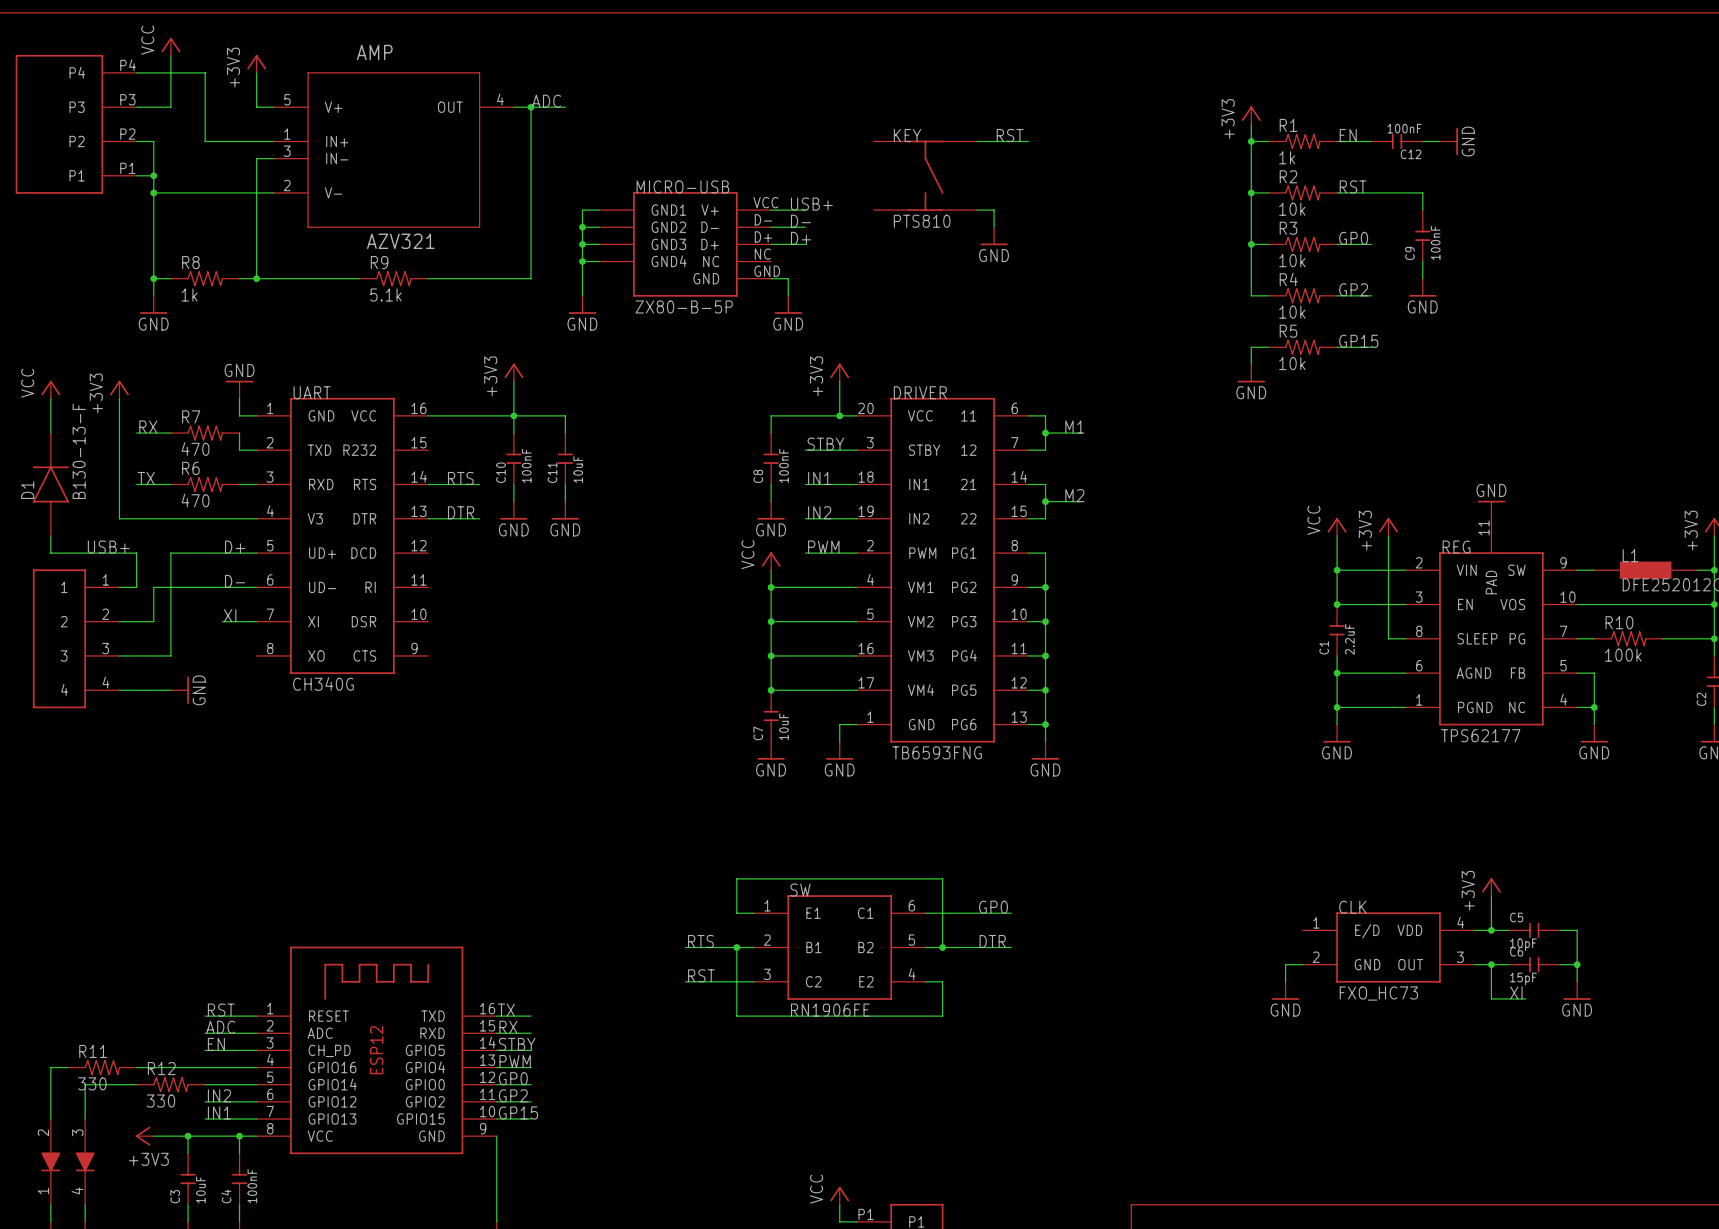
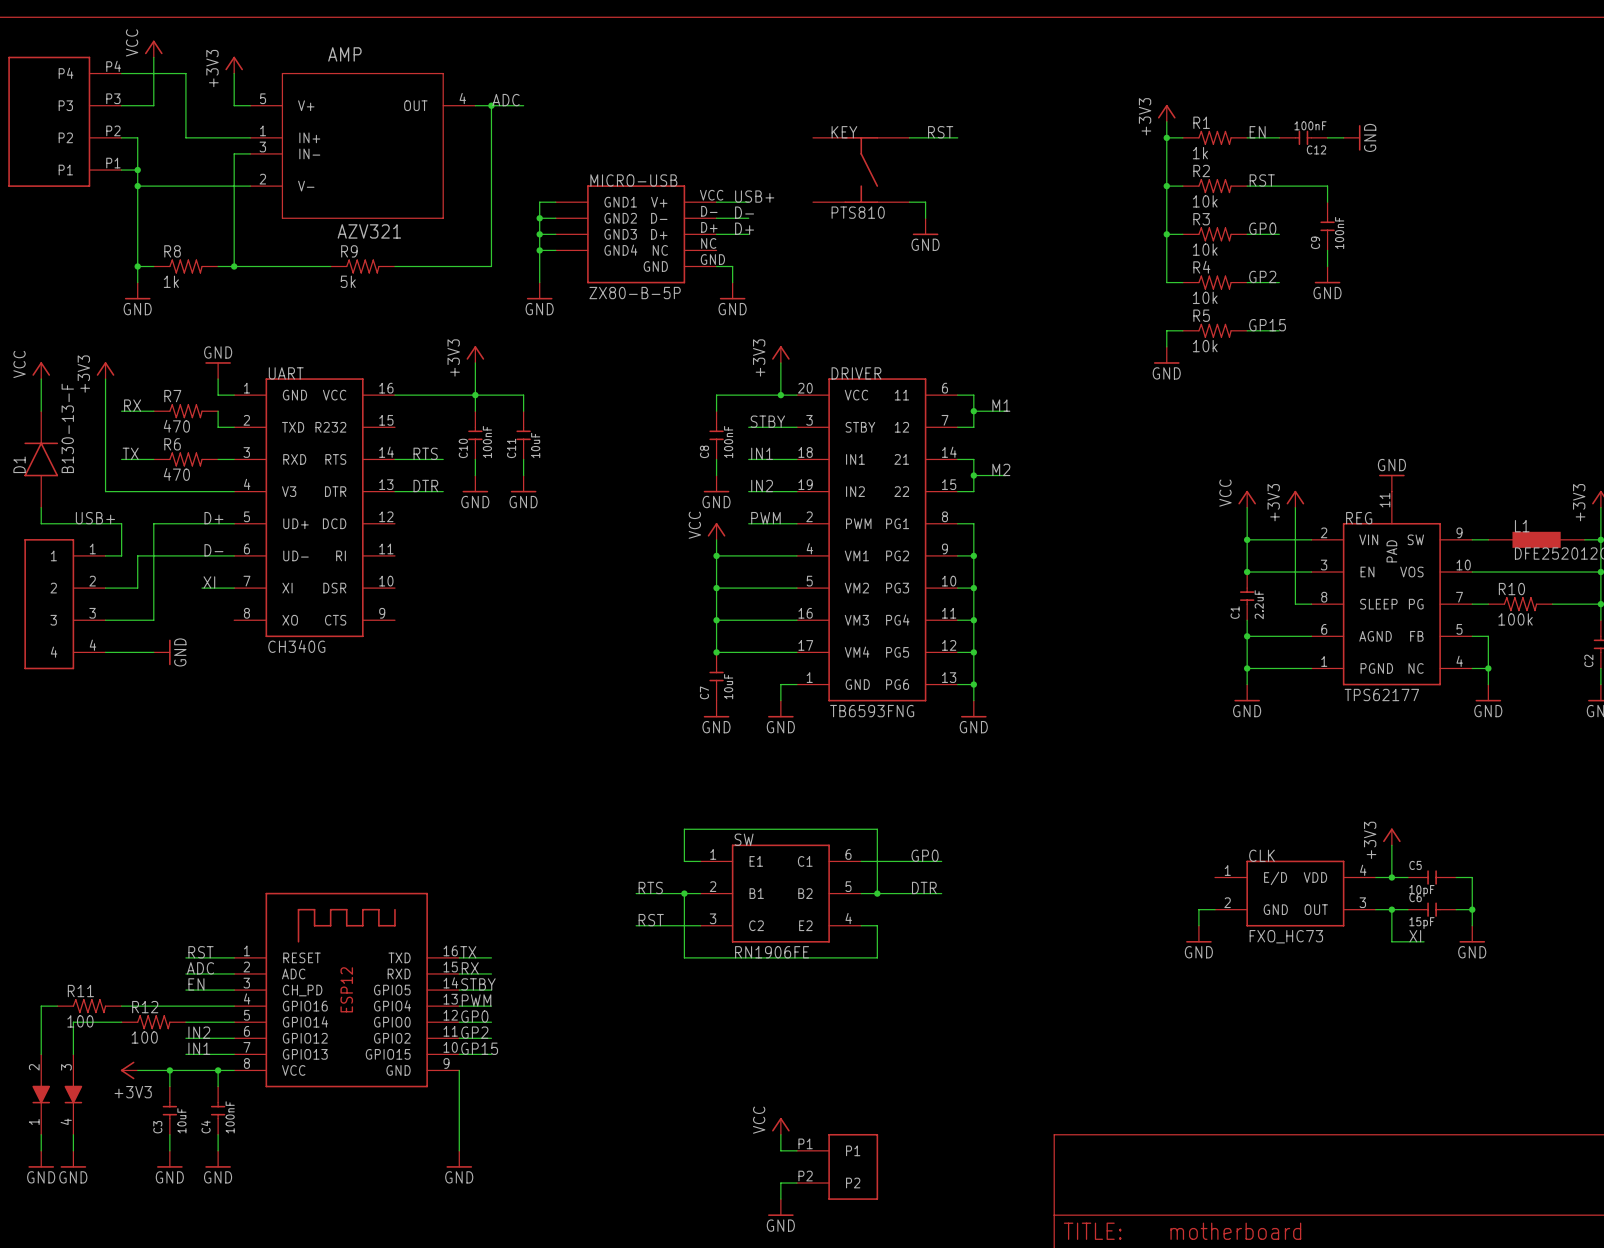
R9 value: 5.1k (385, 294) -> 5k (348, 281)
R11 value: 330 (92, 1083) -> 100 (80, 1021)
R12 value: 330 (160, 1101) -> 100 (144, 1037)

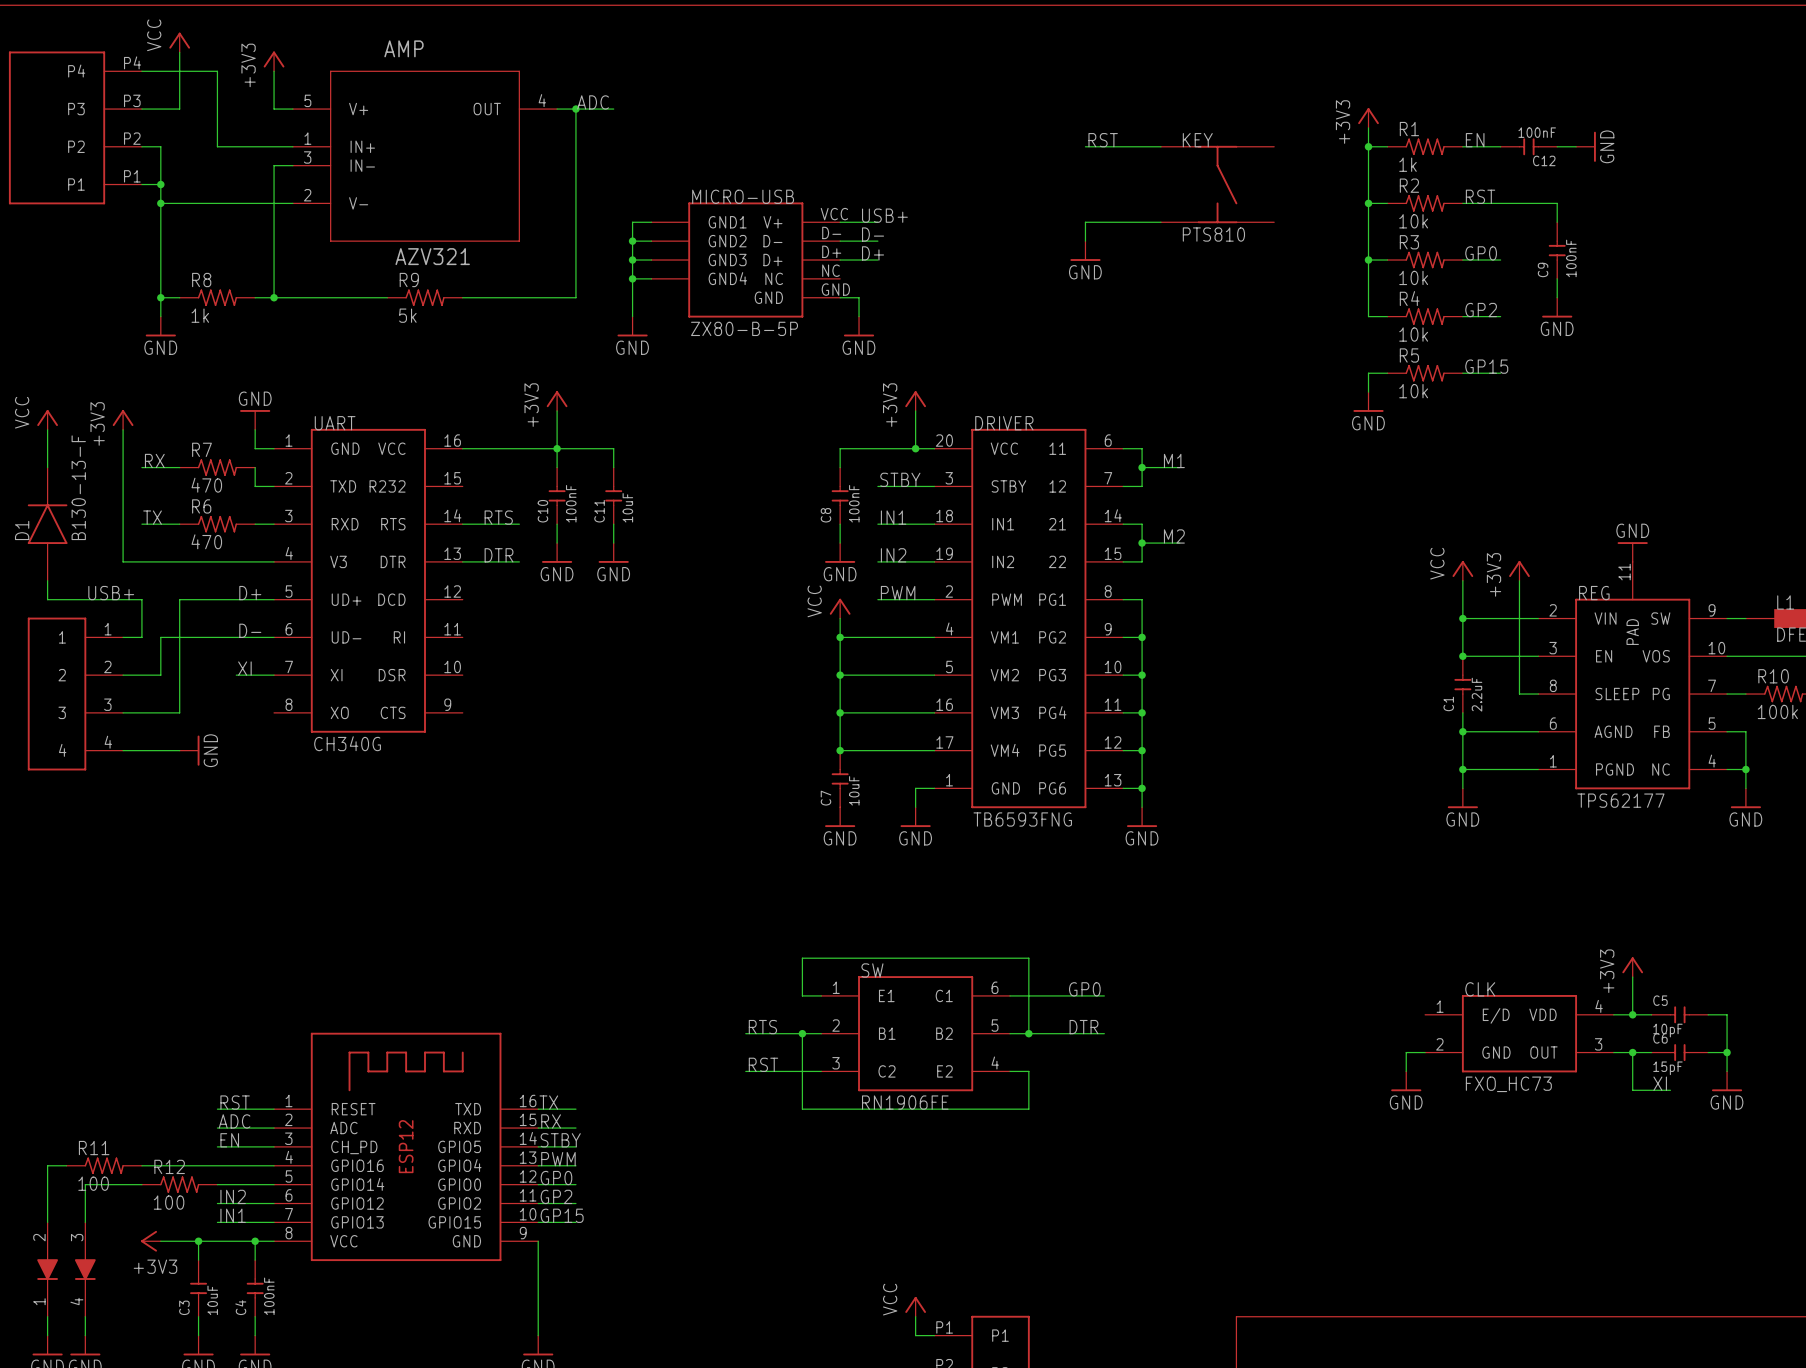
wire: (909, 137) (925, 137) -> none
wire: none -> (1123, 146) (1160, 146)
KEY: PTS810 (861, 170) -> none
KEY: none -> PTS810 (1217, 184)
wire: (909, 202) (925, 202) -> (1160, 222) (1085, 222)

